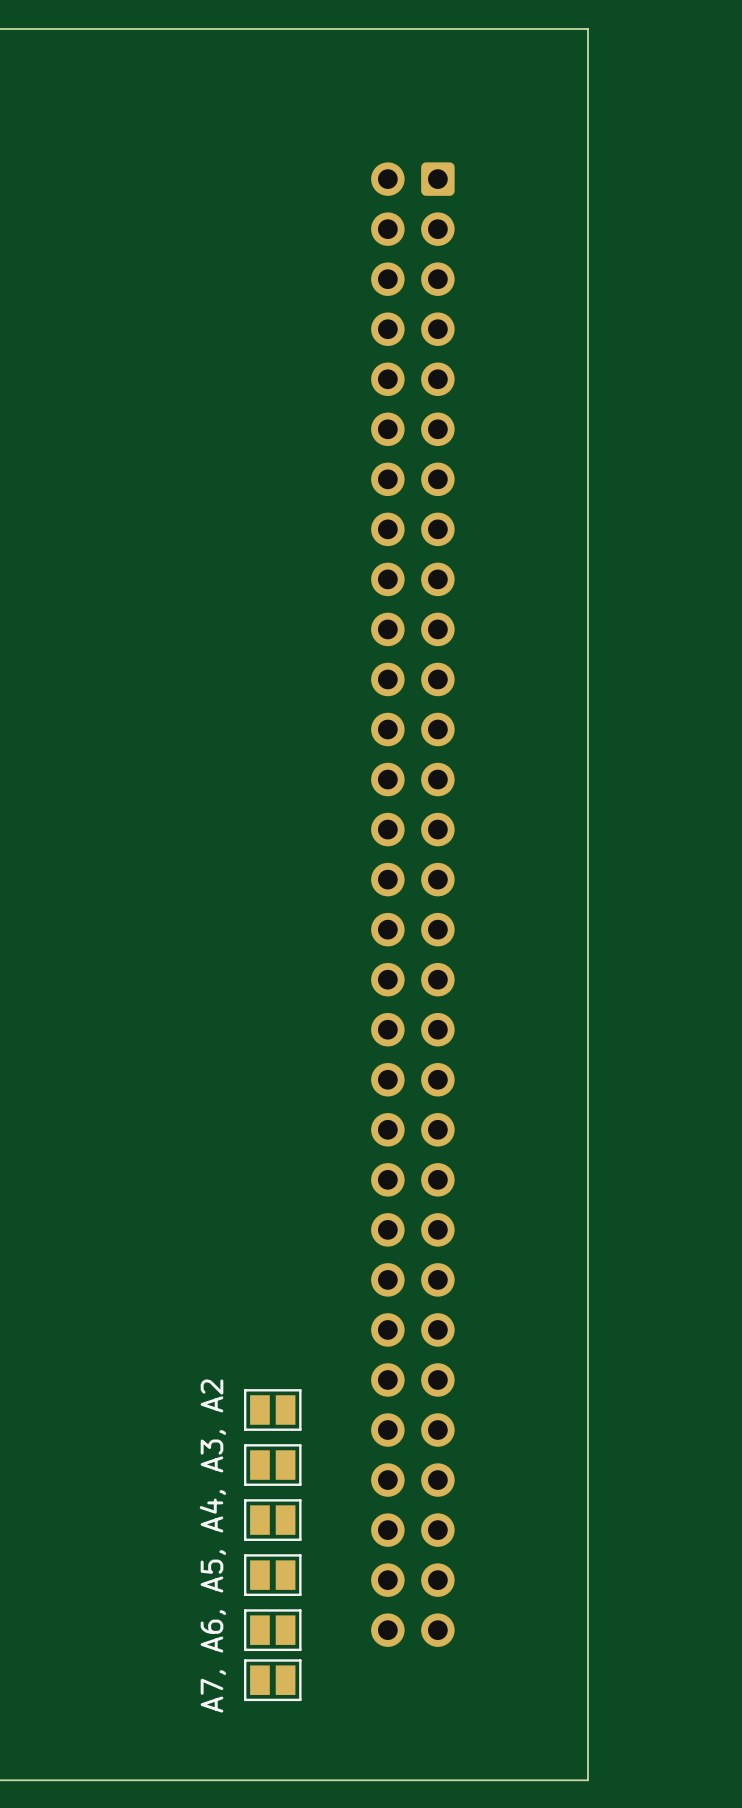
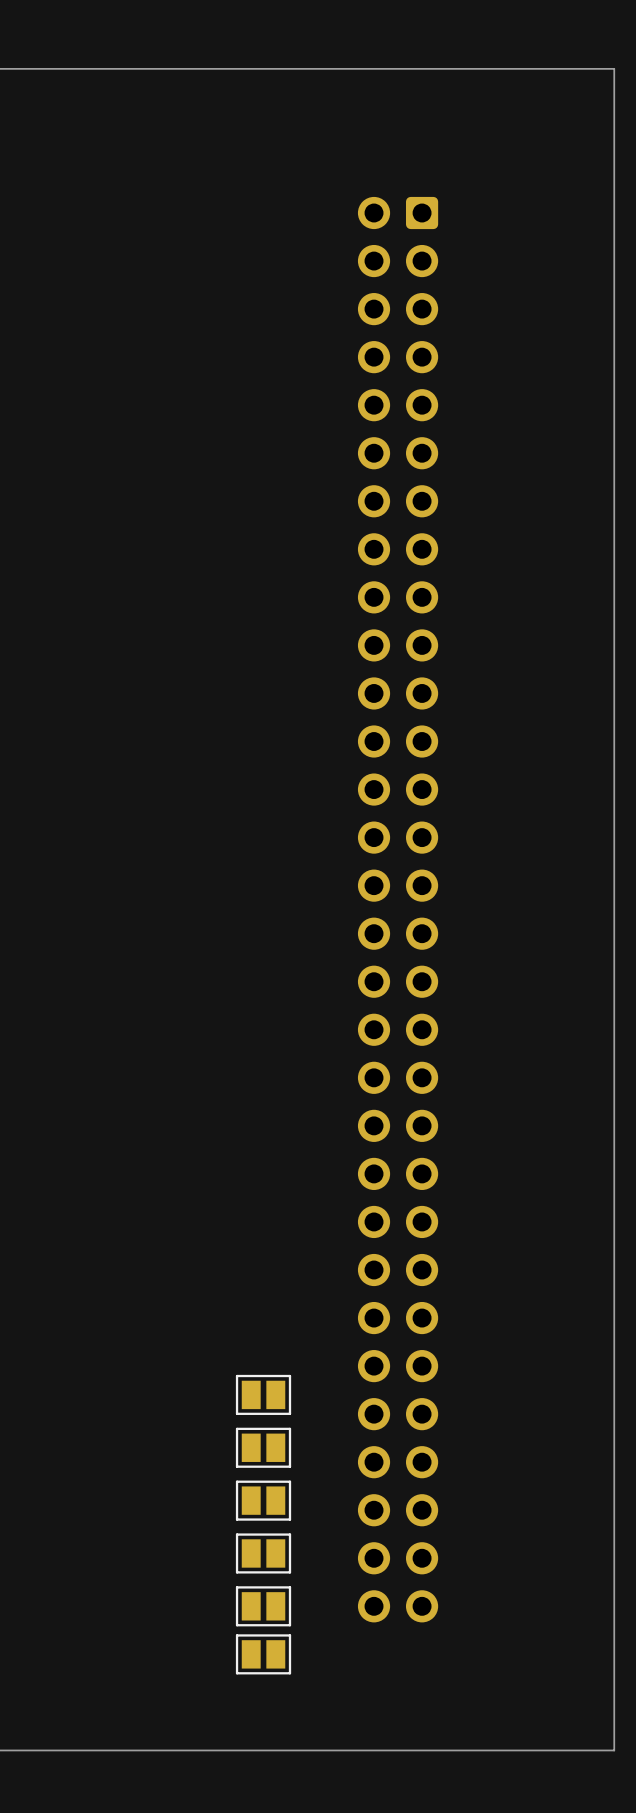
board edge: (588, 29) (588, 1780) -> (566, 68) (614, 68) (614, 1750) (566, 1750)
text: A7, A6, A5, A4, A3, A2 (212, 1546) -> none

